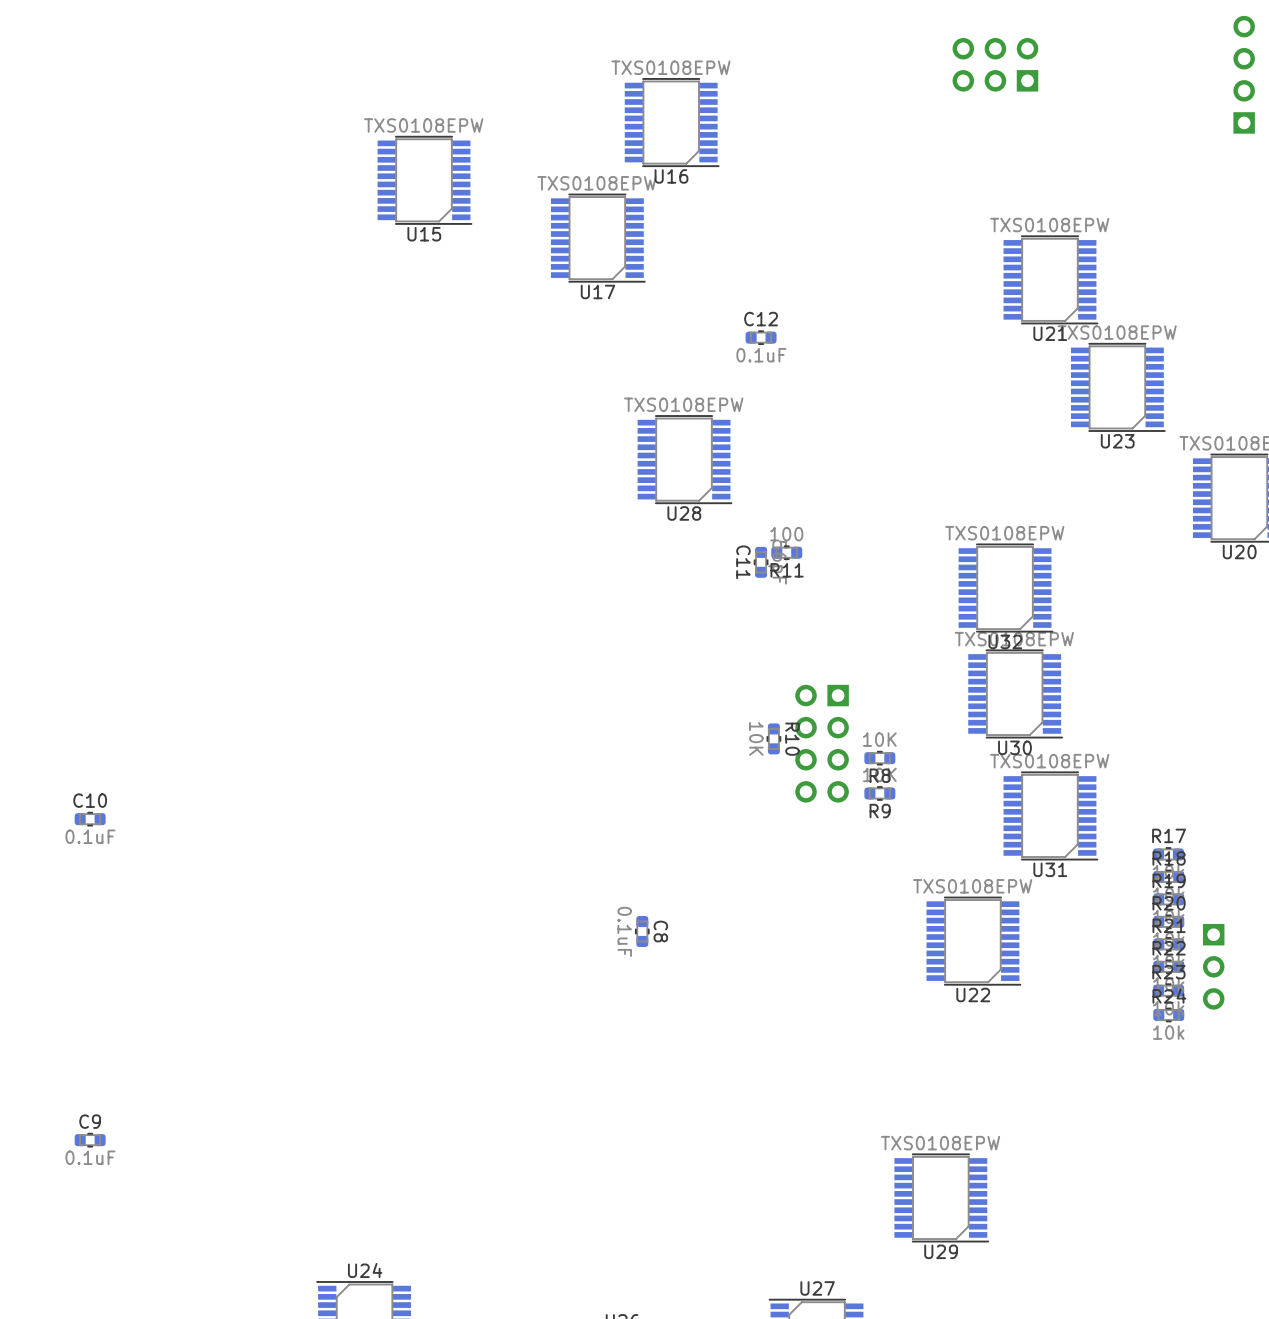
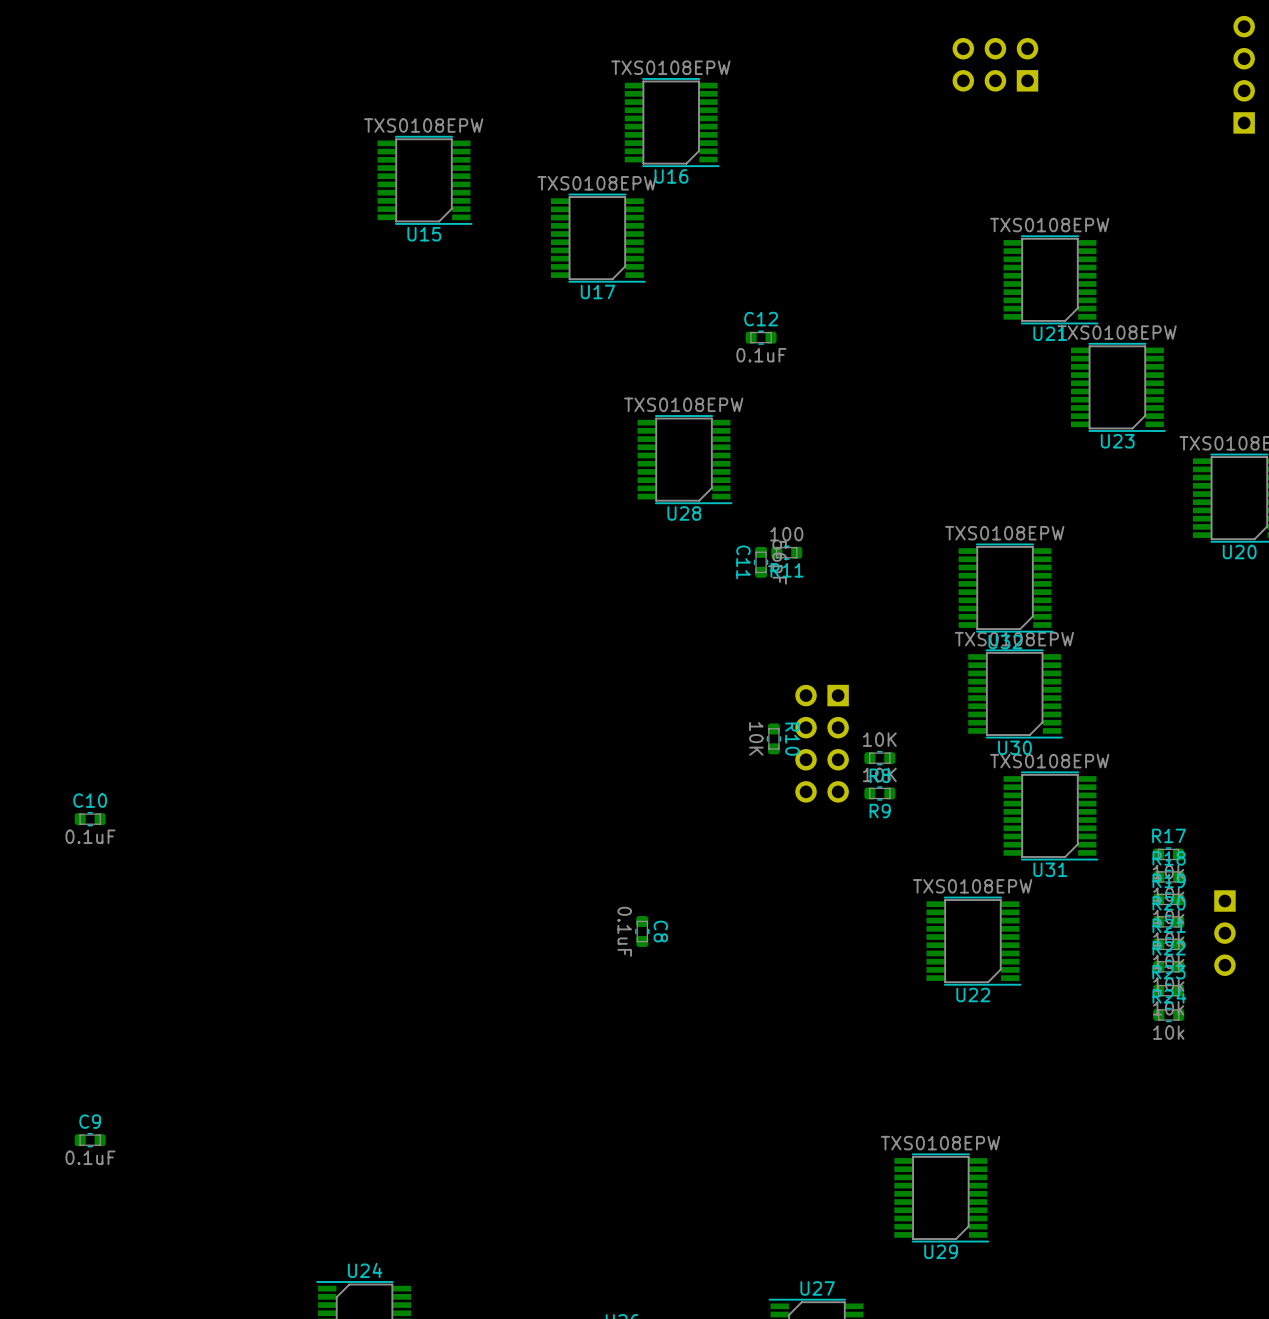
part position: (1213, 966) -> (1224, 933)

